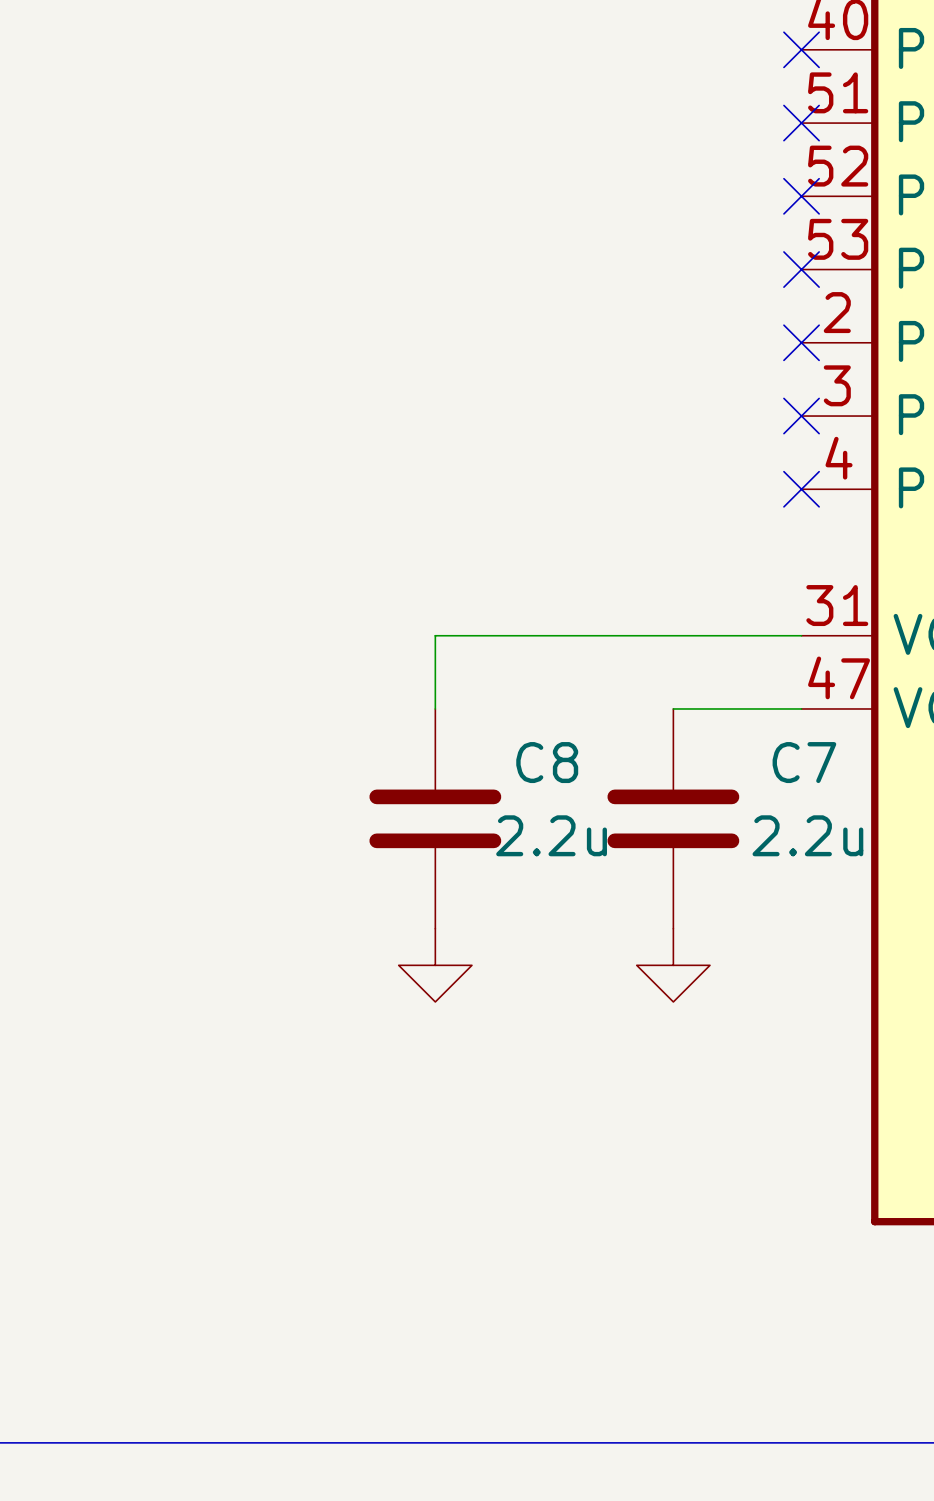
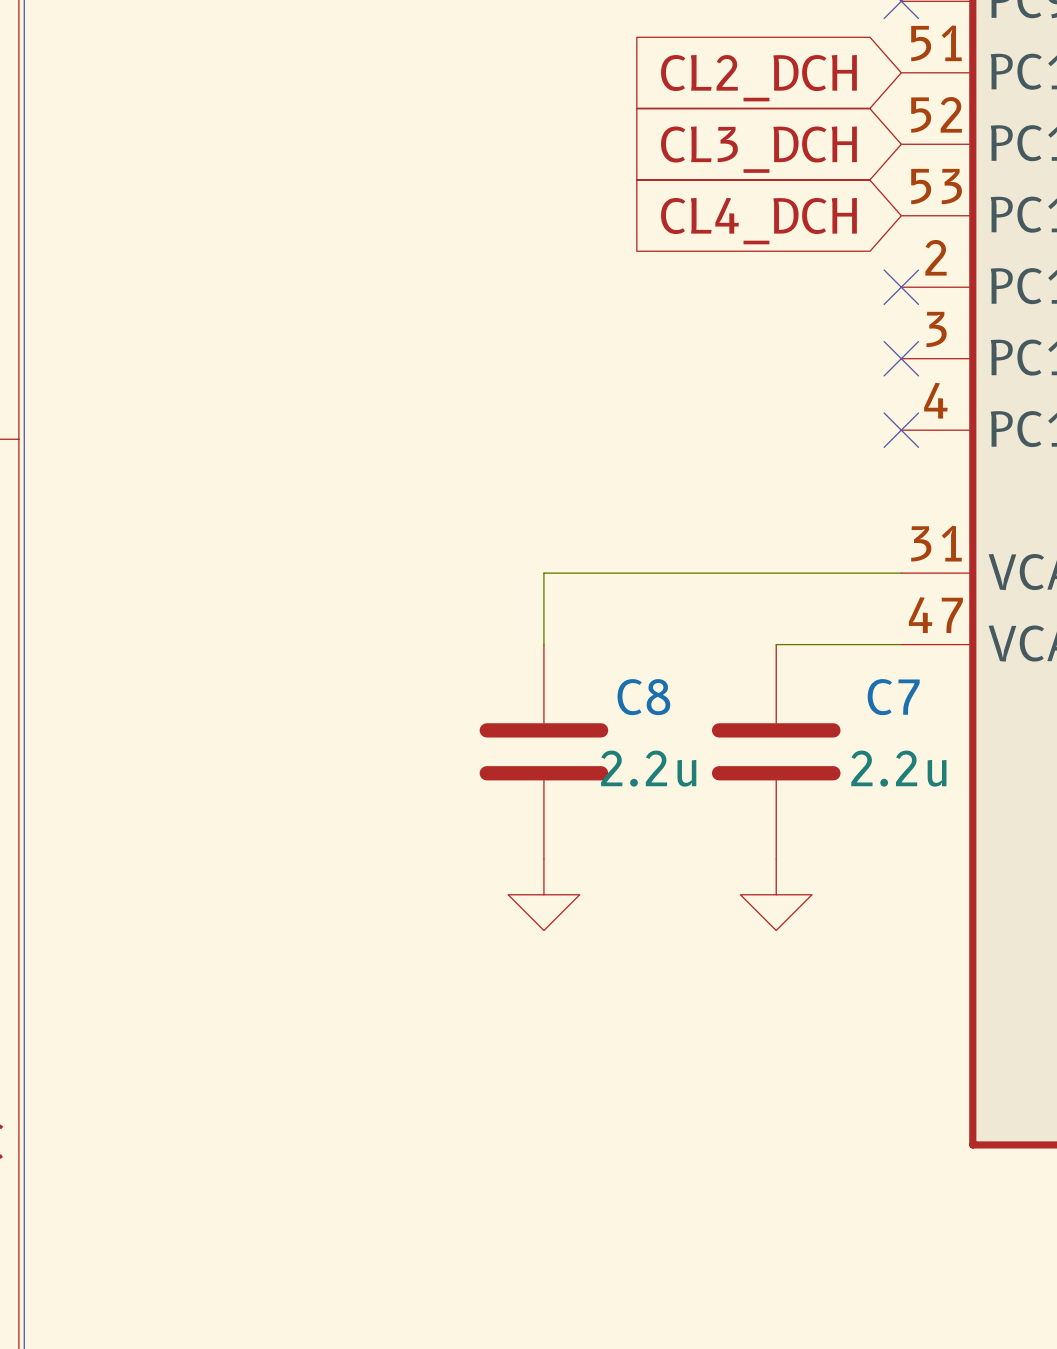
no-connect mark: (801, 123) -> none
global label: none -> CL2_DCH (758, 78)
no-connect mark: (801, 196) -> none
global label: none -> CL3_DCH (758, 149)
no-connect mark: (801, 269) -> none
global label: none -> CL4_DCH (758, 221)

